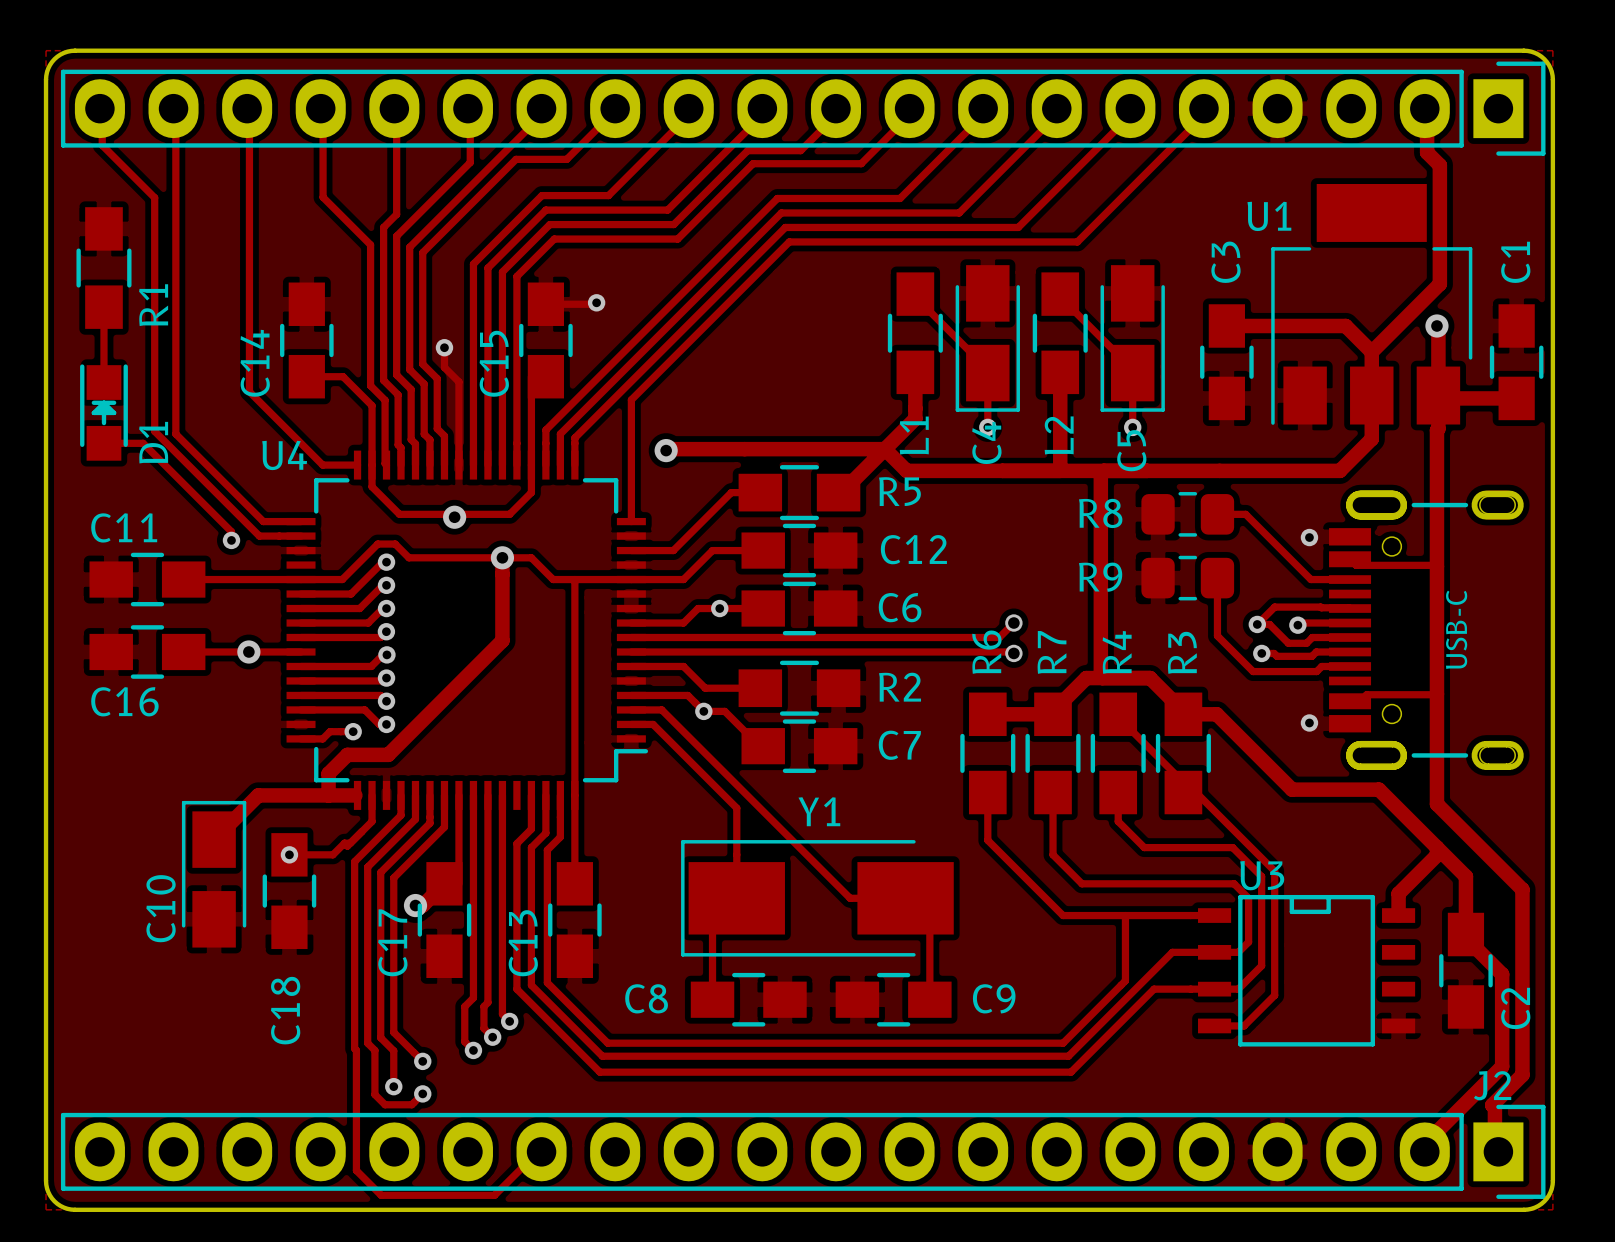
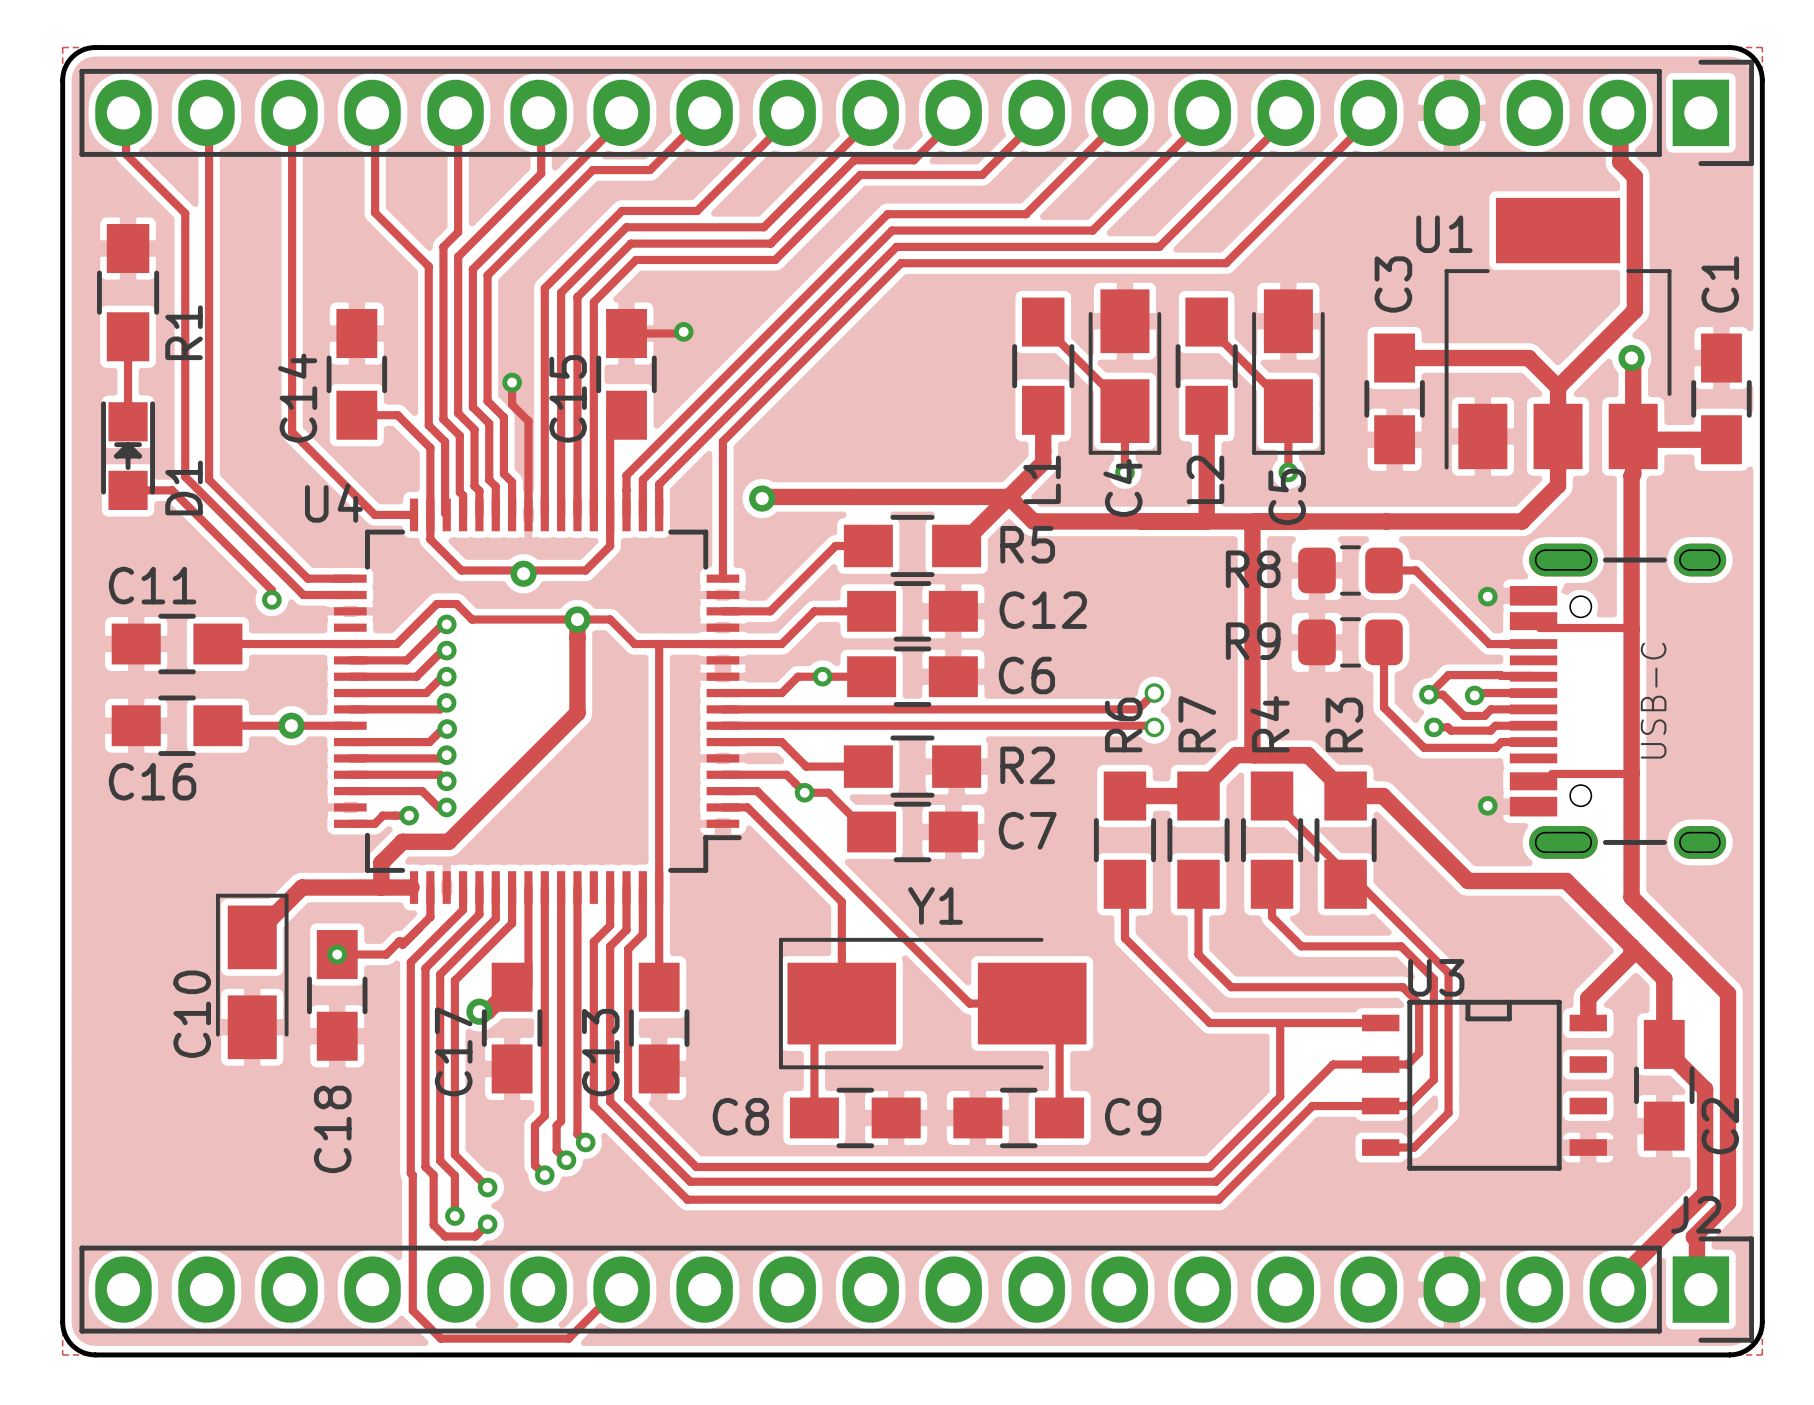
part footprint: [1329, 490, 1524, 770] -> [1509, 543, 1727, 859]

